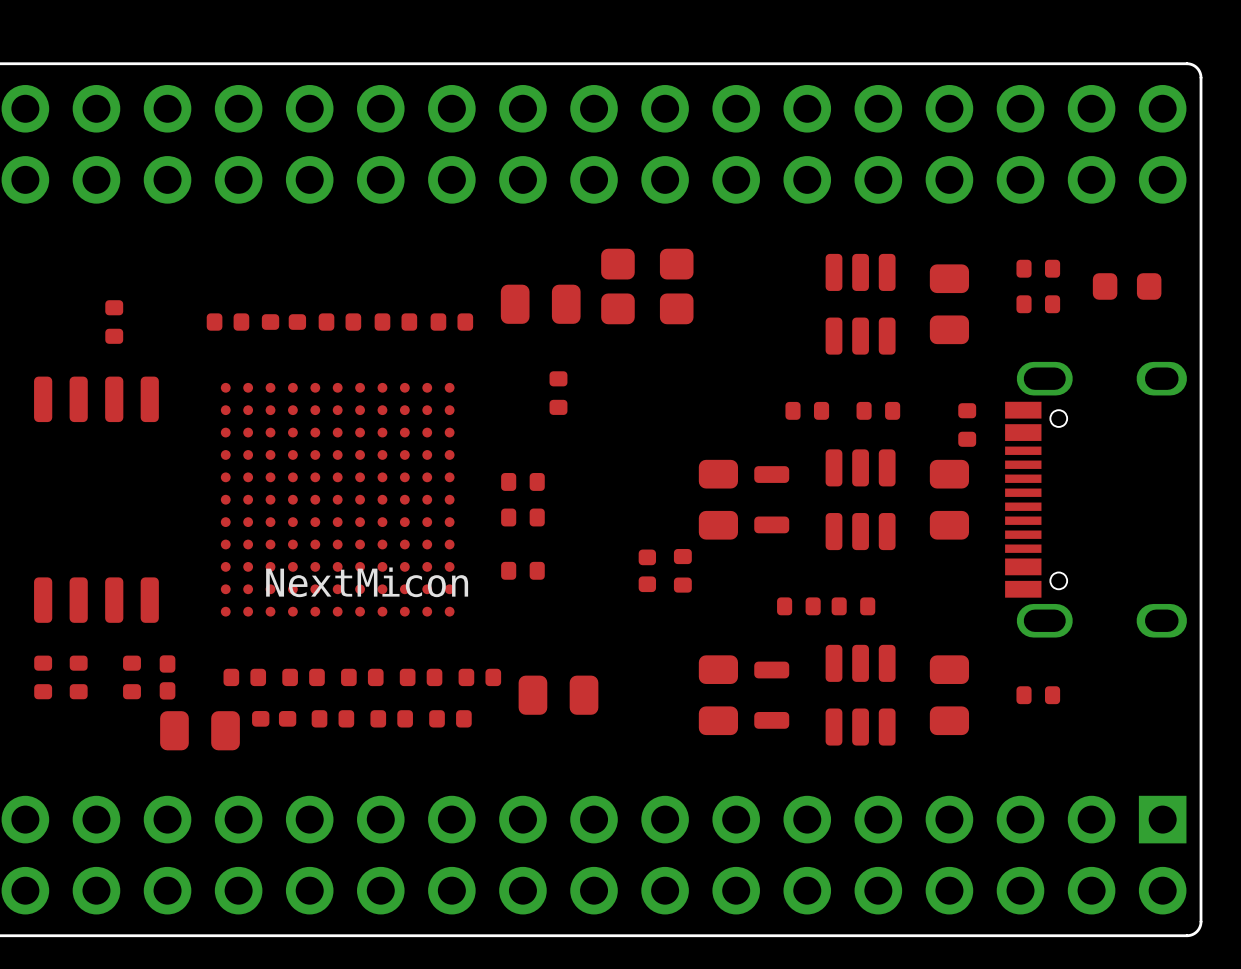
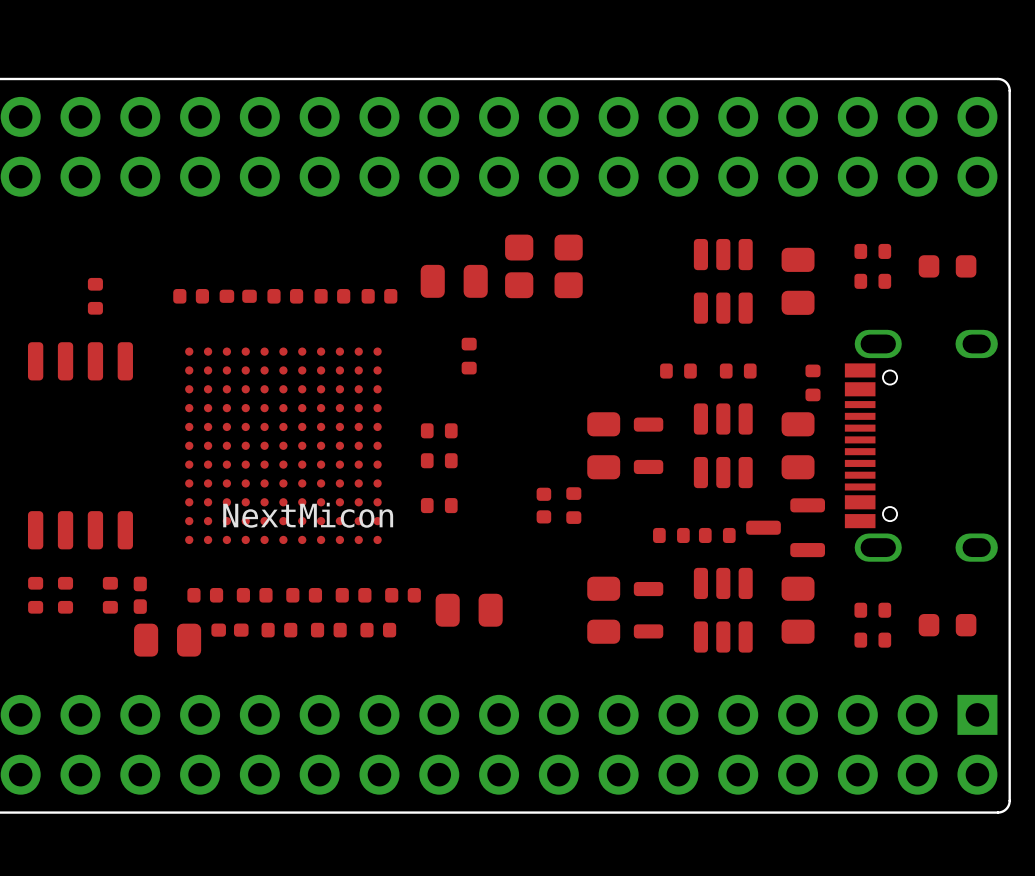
part: none -> (785, 527)
part: none -> (947, 625)
part: none -> (872, 640)

